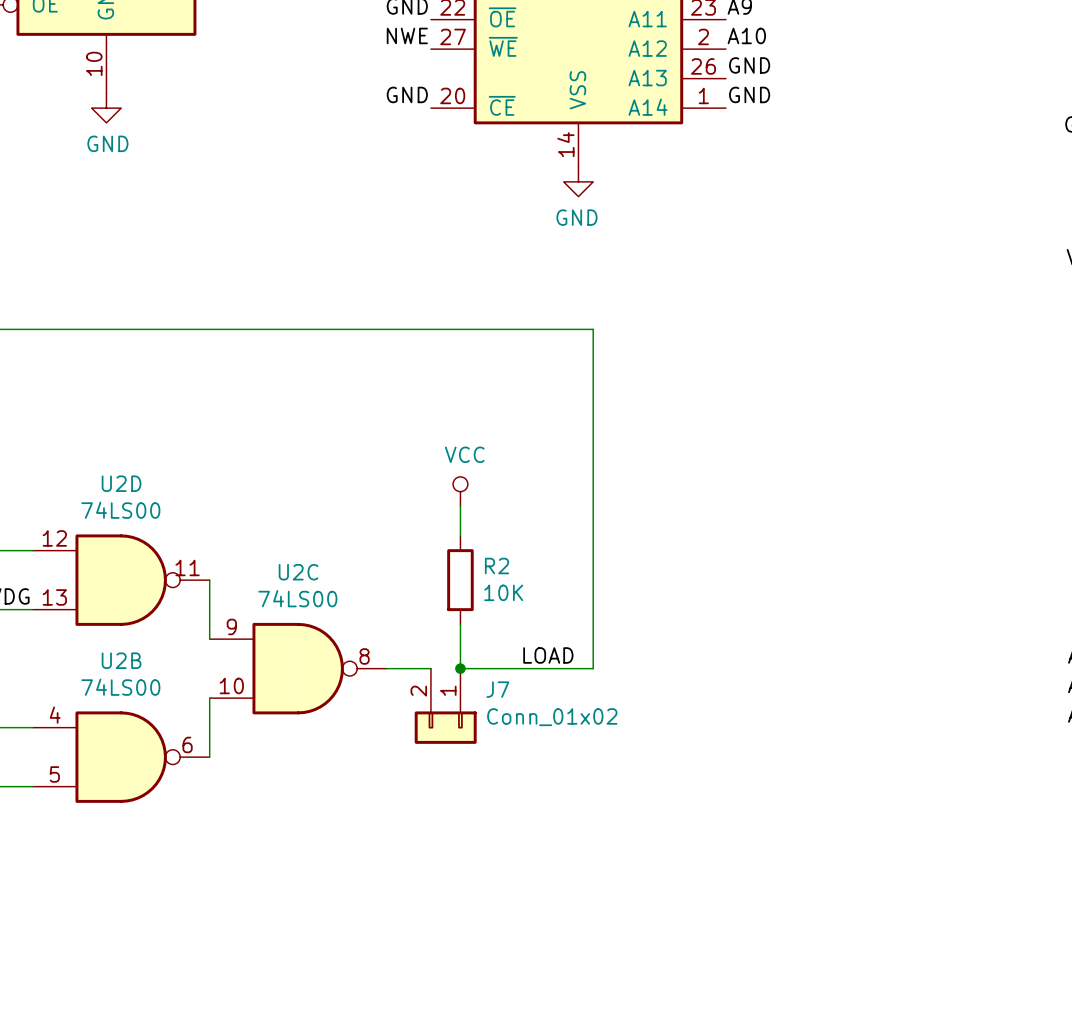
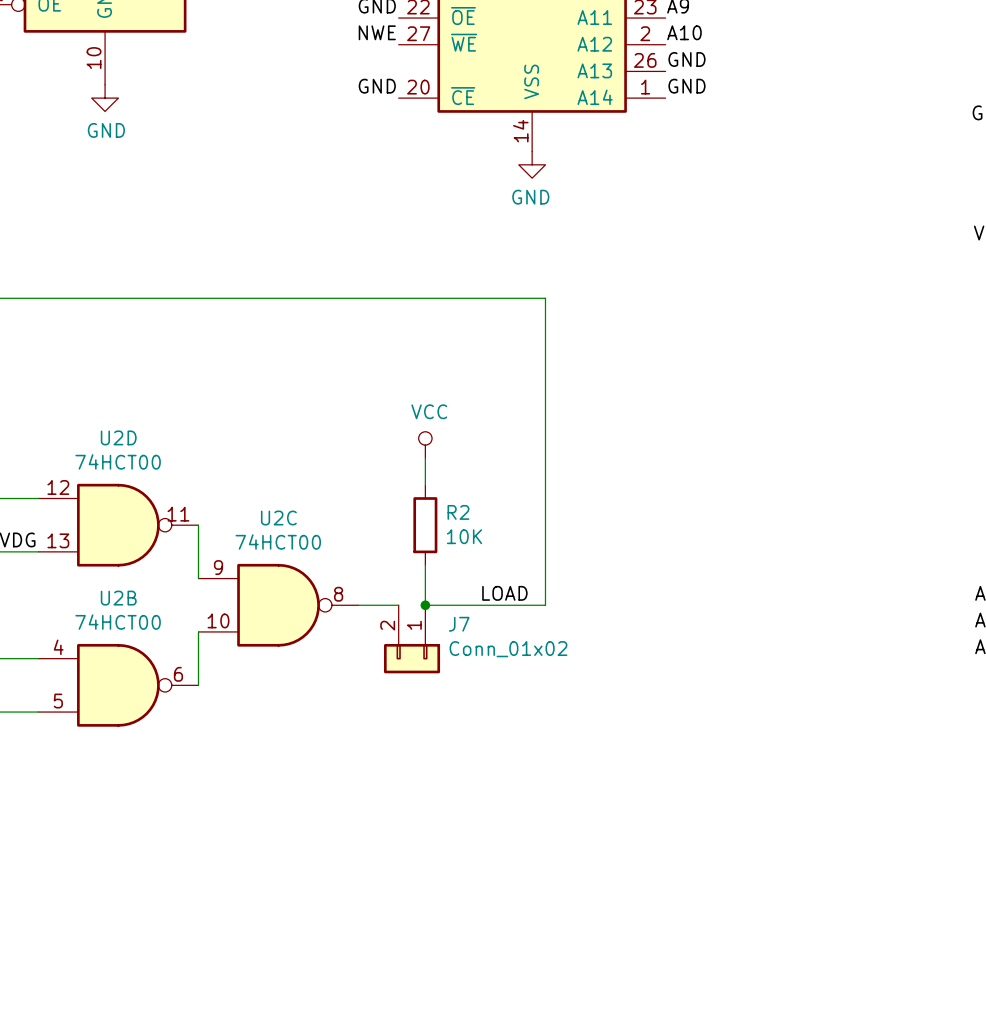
U2D value: 74LS00 (120, 510) -> 74HCT00 (118, 461)
U2C value: 74LS00 (297, 598) -> 74HCT00 (278, 541)
U2B value: 74LS00 (120, 687) -> 74HCT00 (118, 622)

